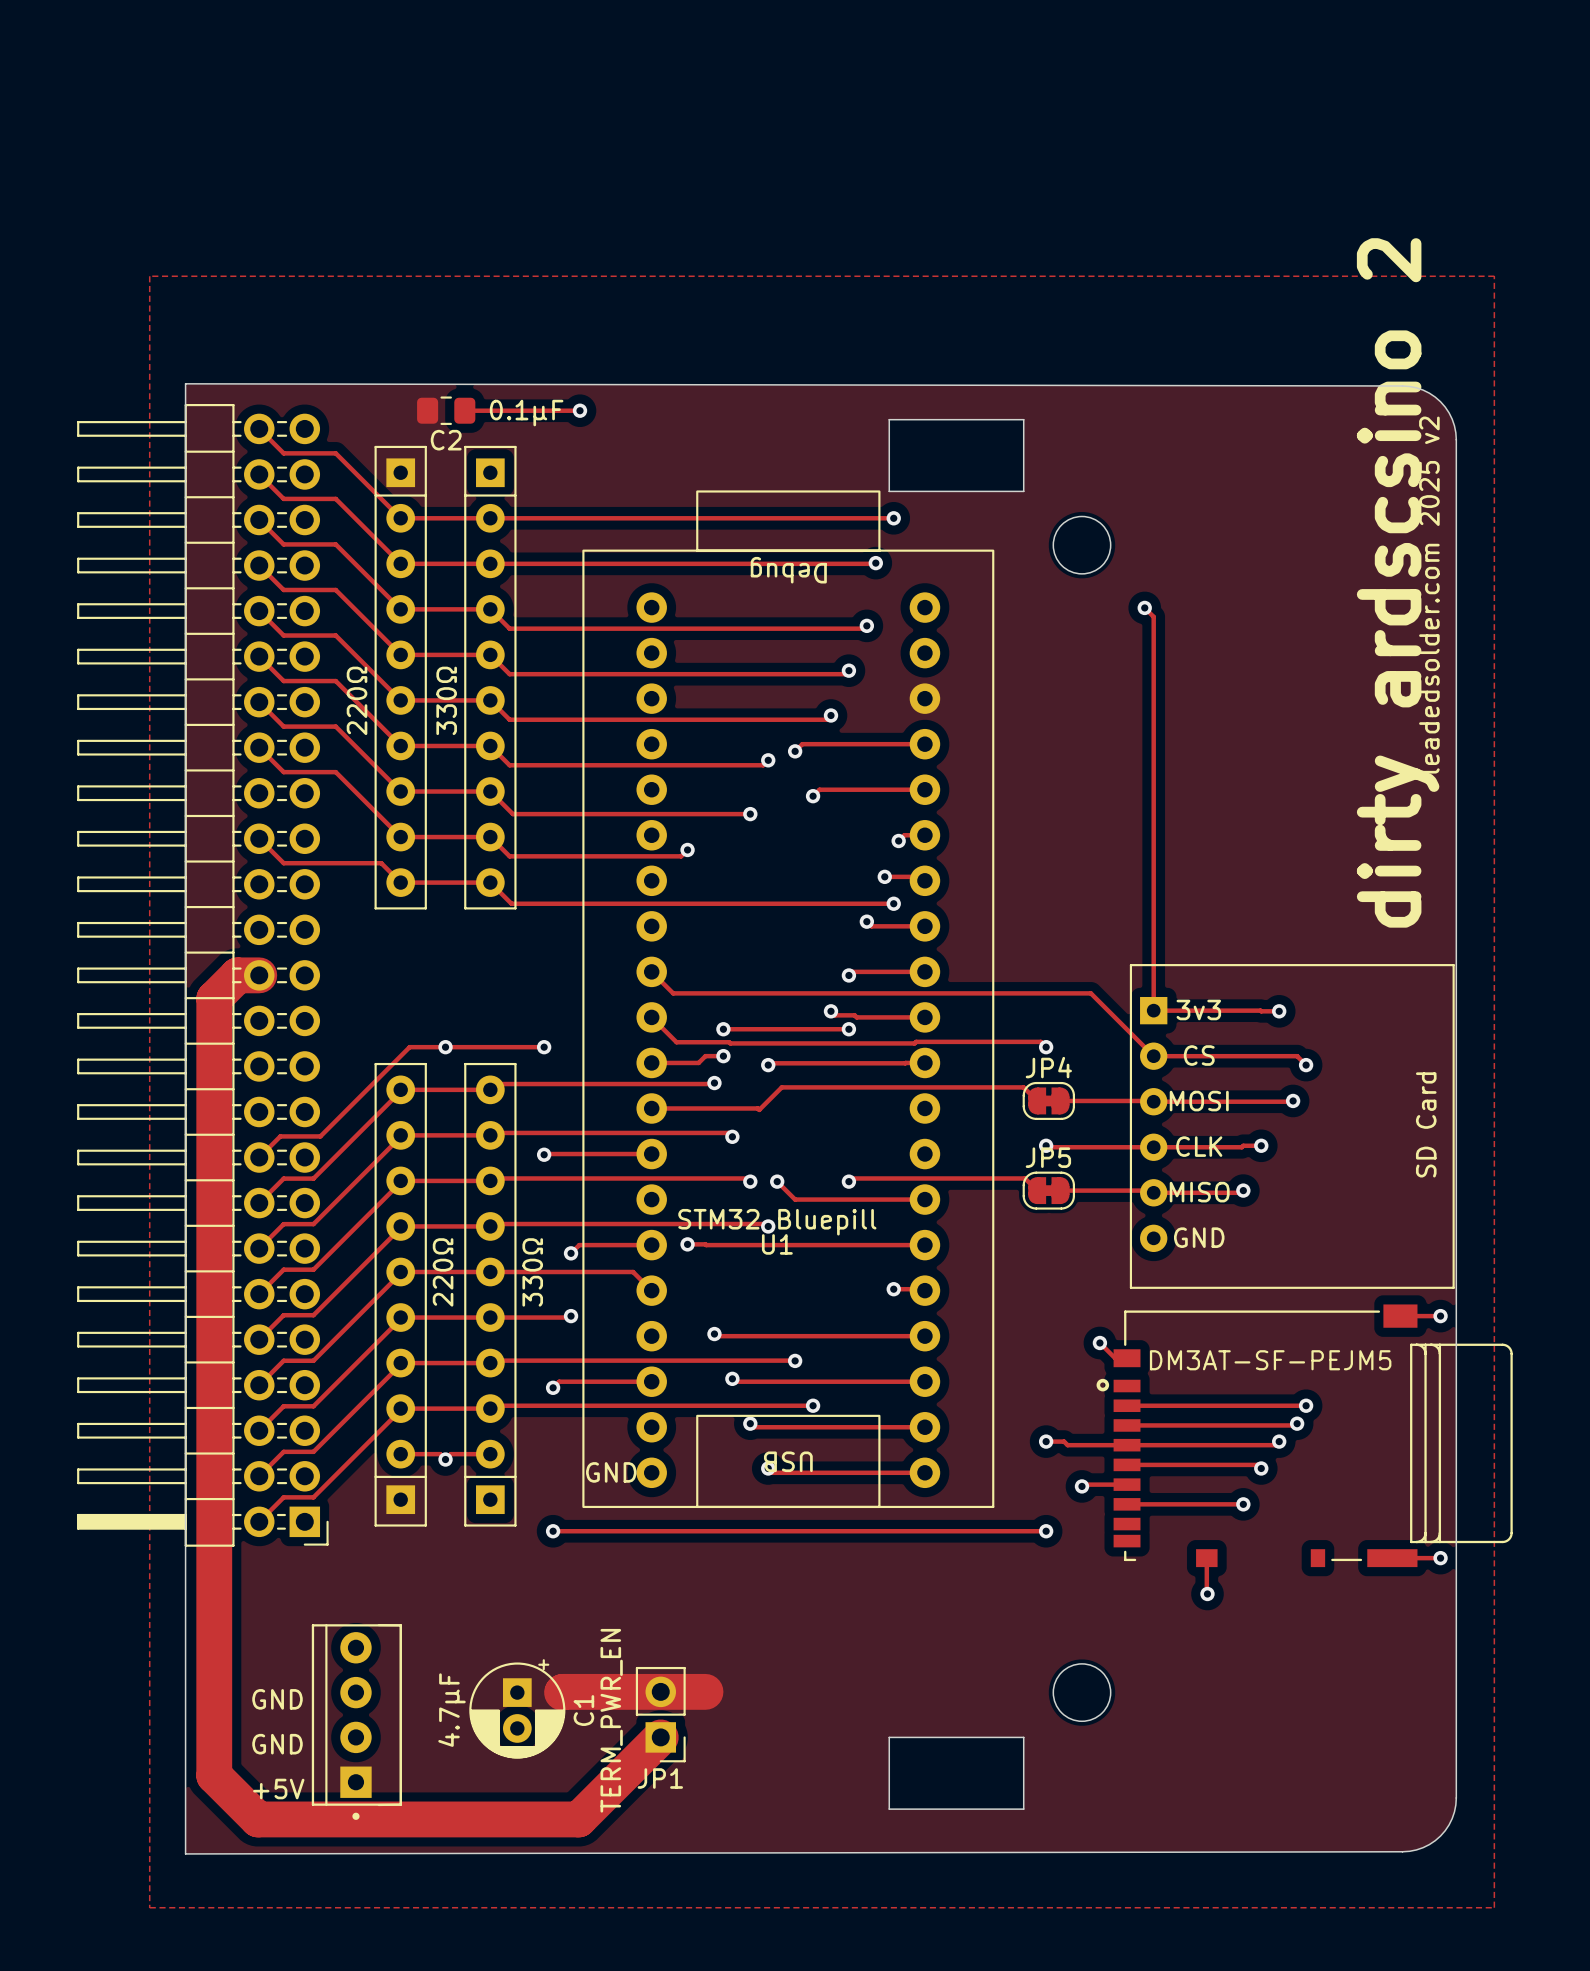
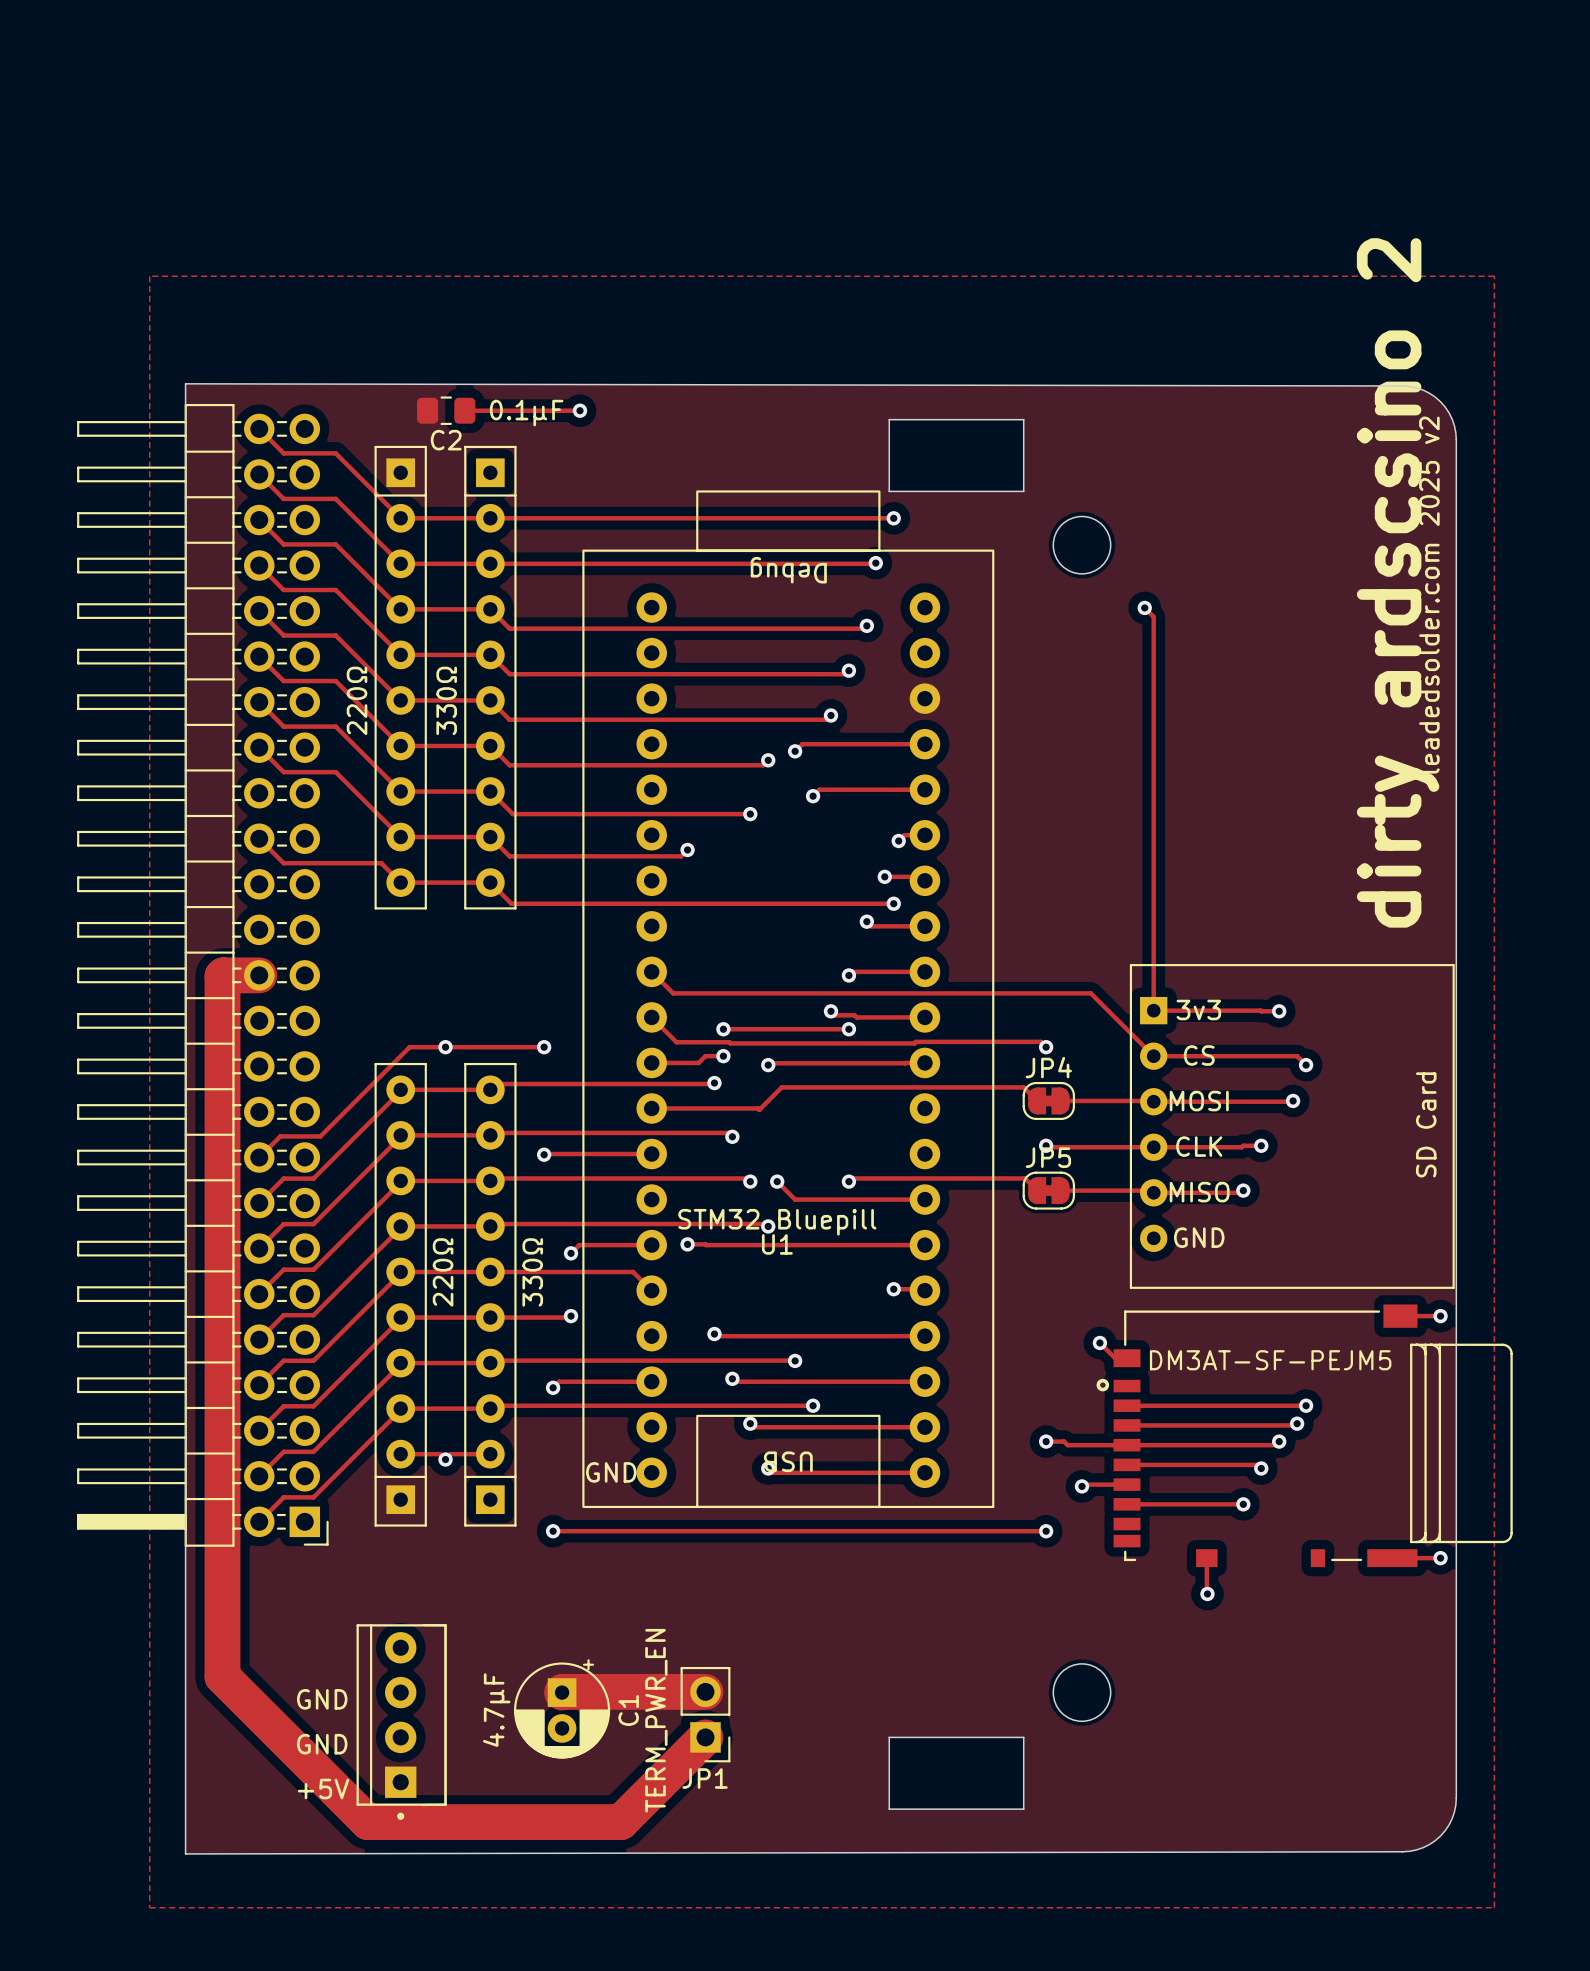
track: (237, 975) (214, 998) (214, 1775) (258, 1819) (578, 1819) (660, 1737) -> (237, 975) (222, 976) (222, 1676) (367, 1822) (620, 1822) (705, 1737)
text position: GND (277, 1699) -> GND (322, 1699)
C1 position: (517, 1708) -> (562, 1708)
JP1 position: (660, 1714) -> (705, 1714)
part position: (356, 1721) -> (401, 1721)
text position: GND (277, 1744) -> GND (322, 1744)
text position: +5V (278, 1789) -> +5V (323, 1789)

